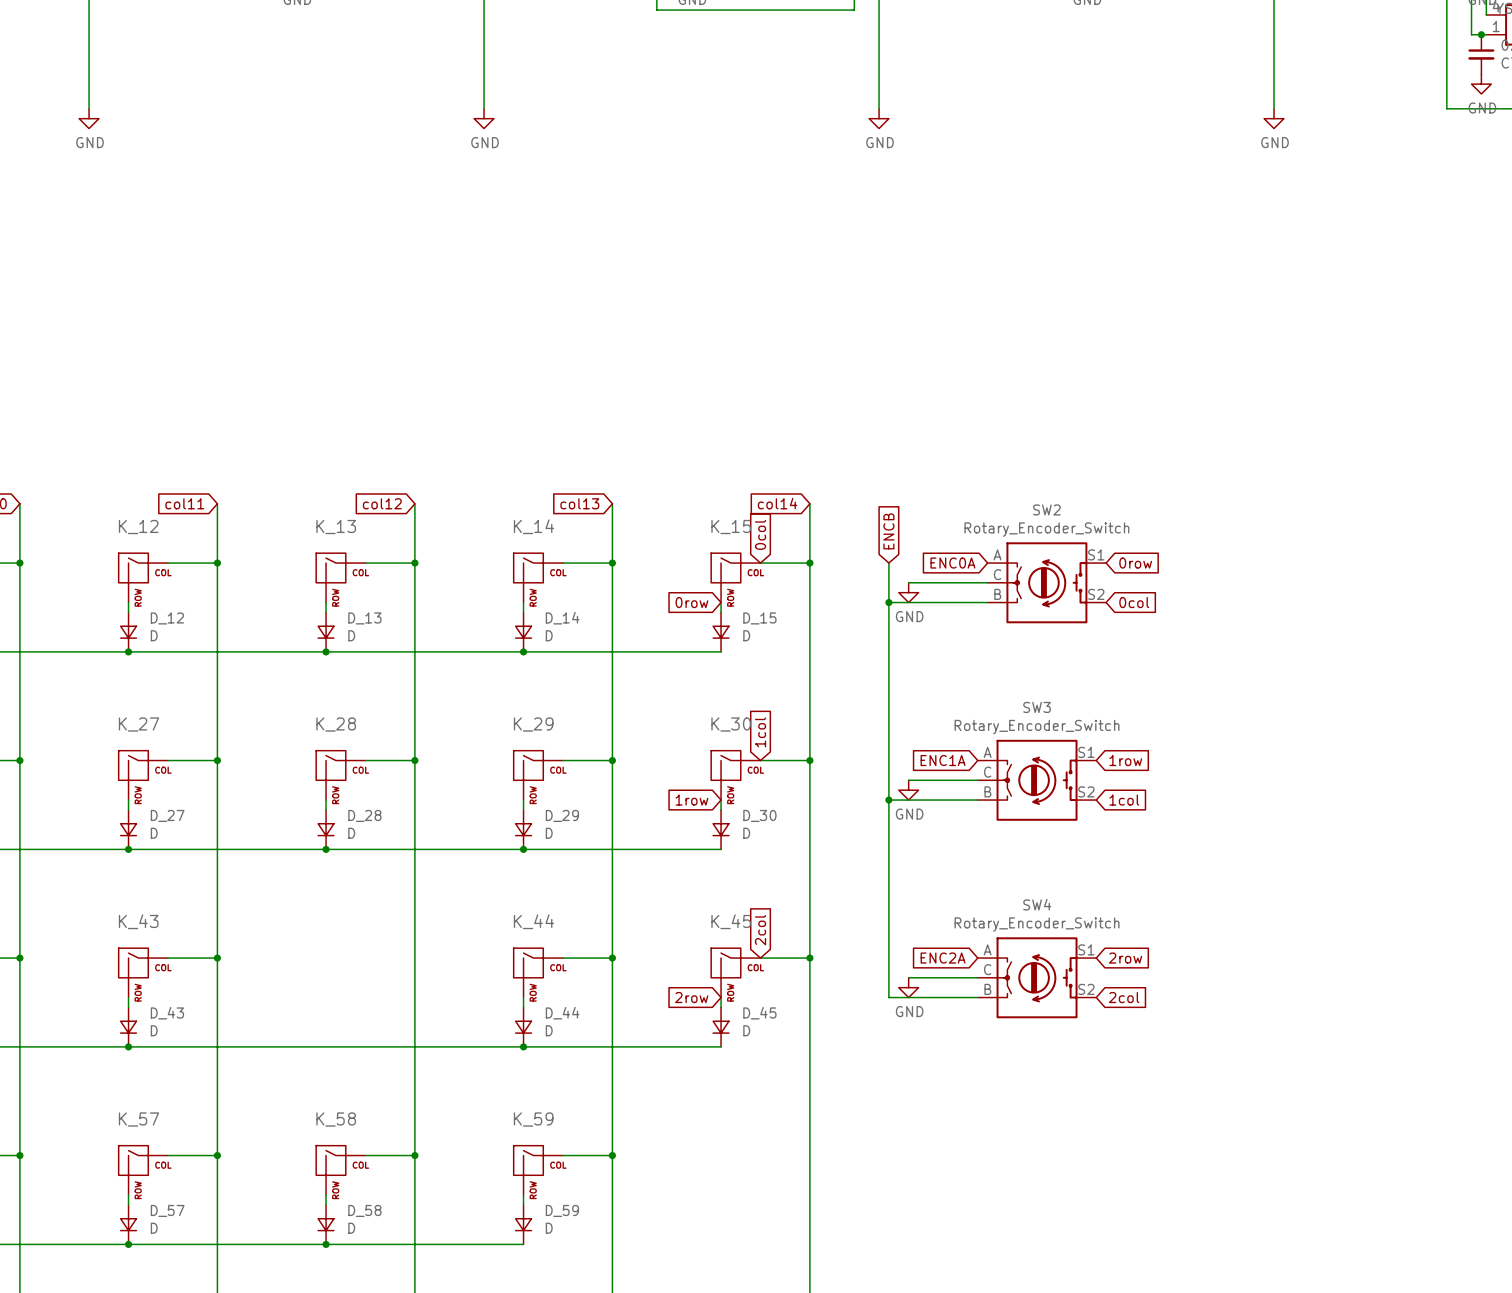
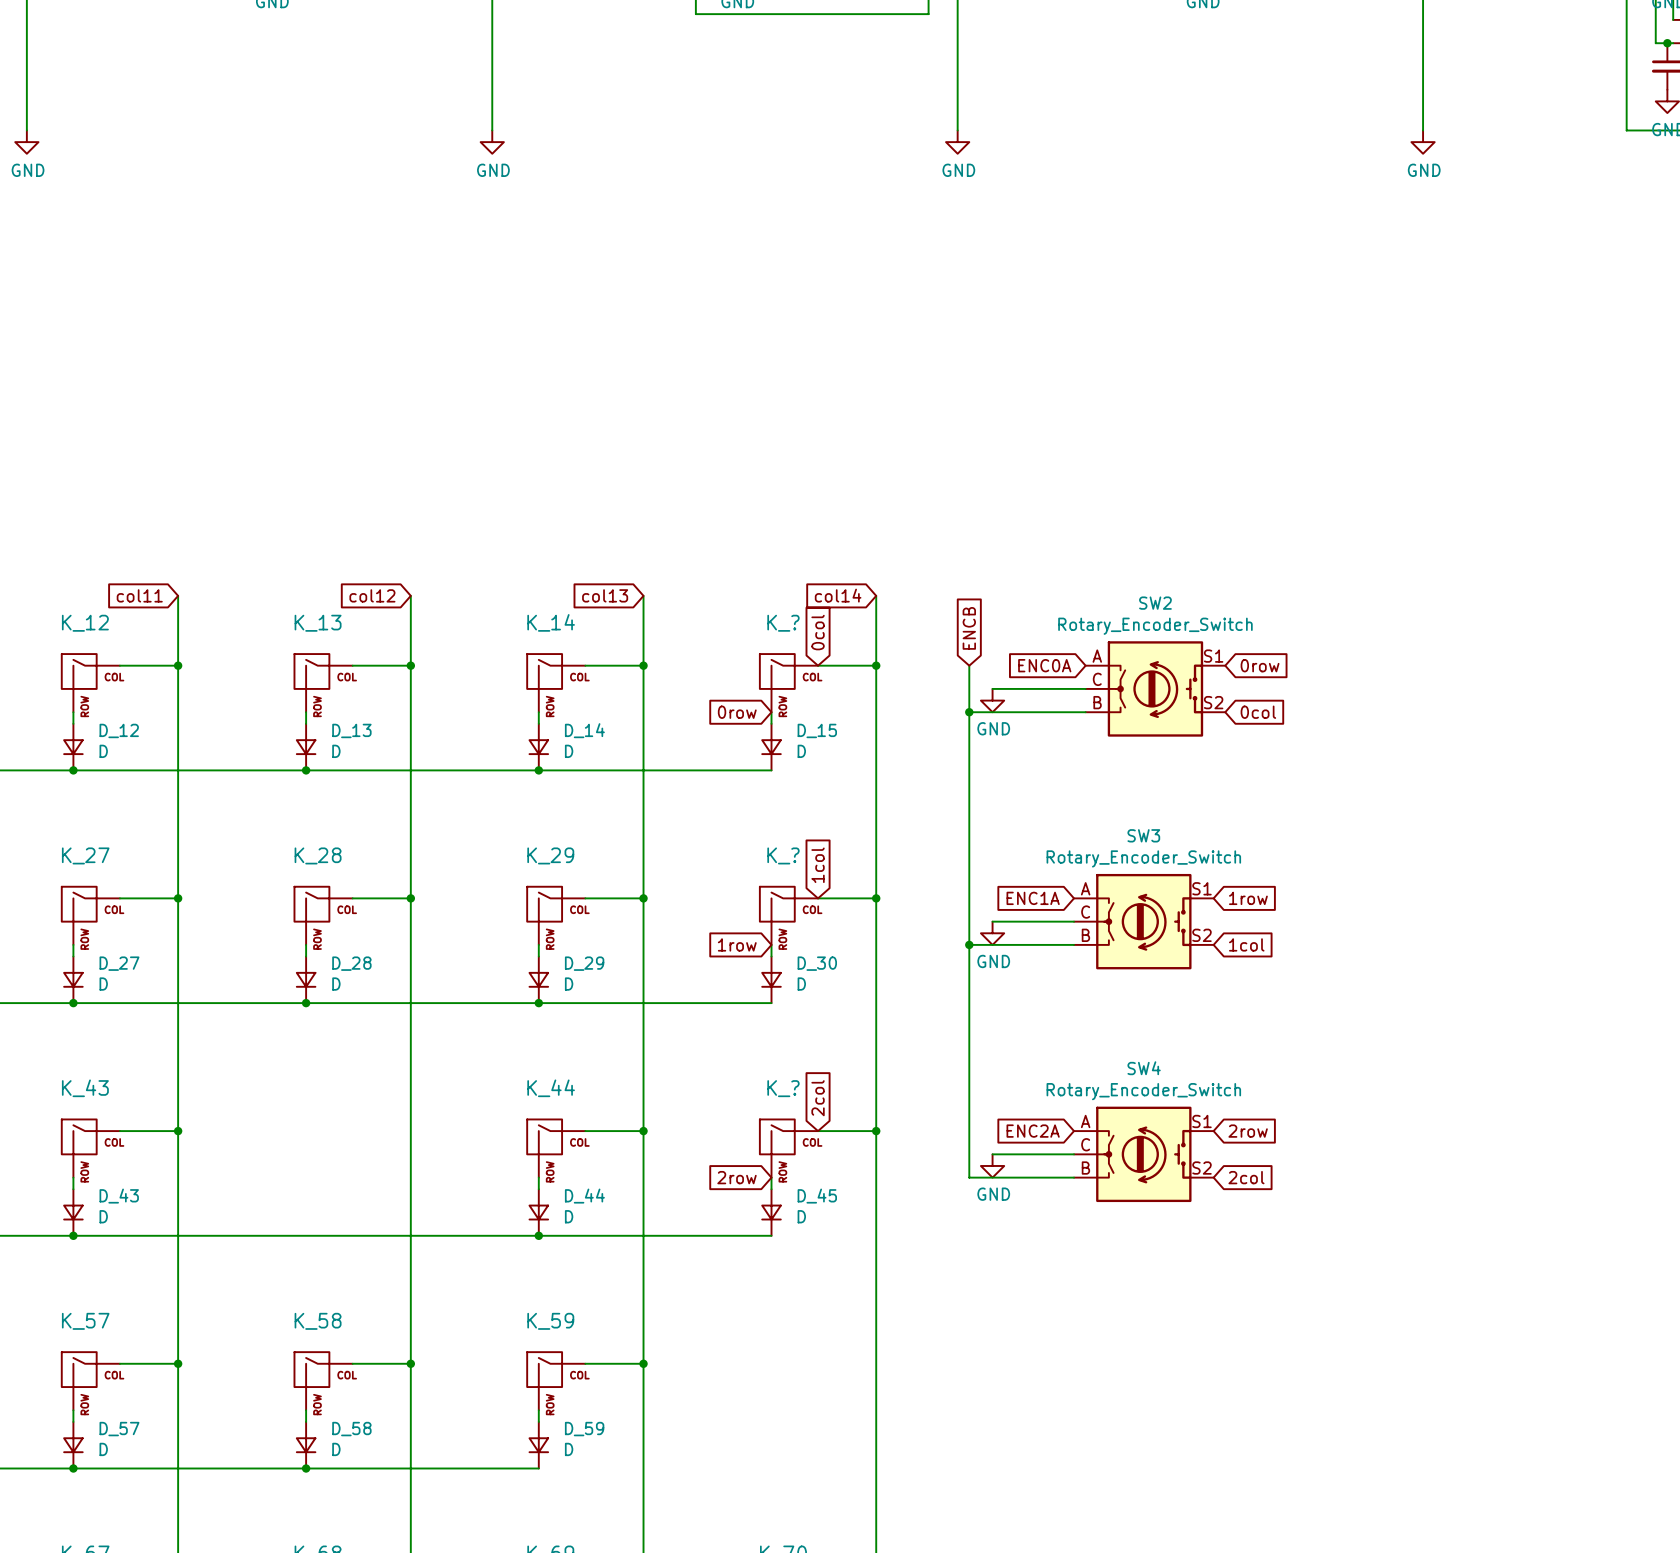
K_15 name: K_15 (731, 527) -> K_? (783, 623)
K_30 name: K_30 (731, 724) -> K_? (783, 855)
K_45 name: K_45 (731, 921) -> K_? (783, 1088)

